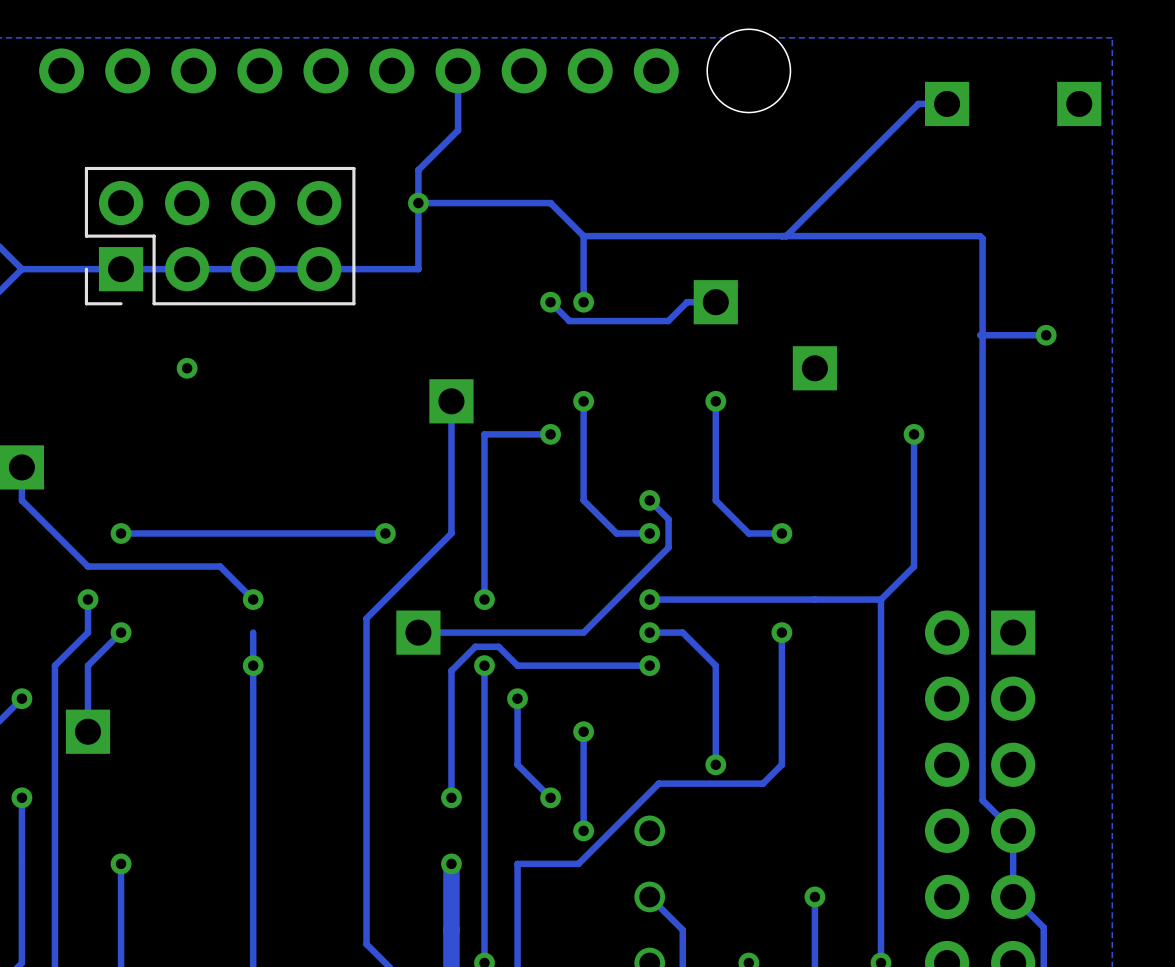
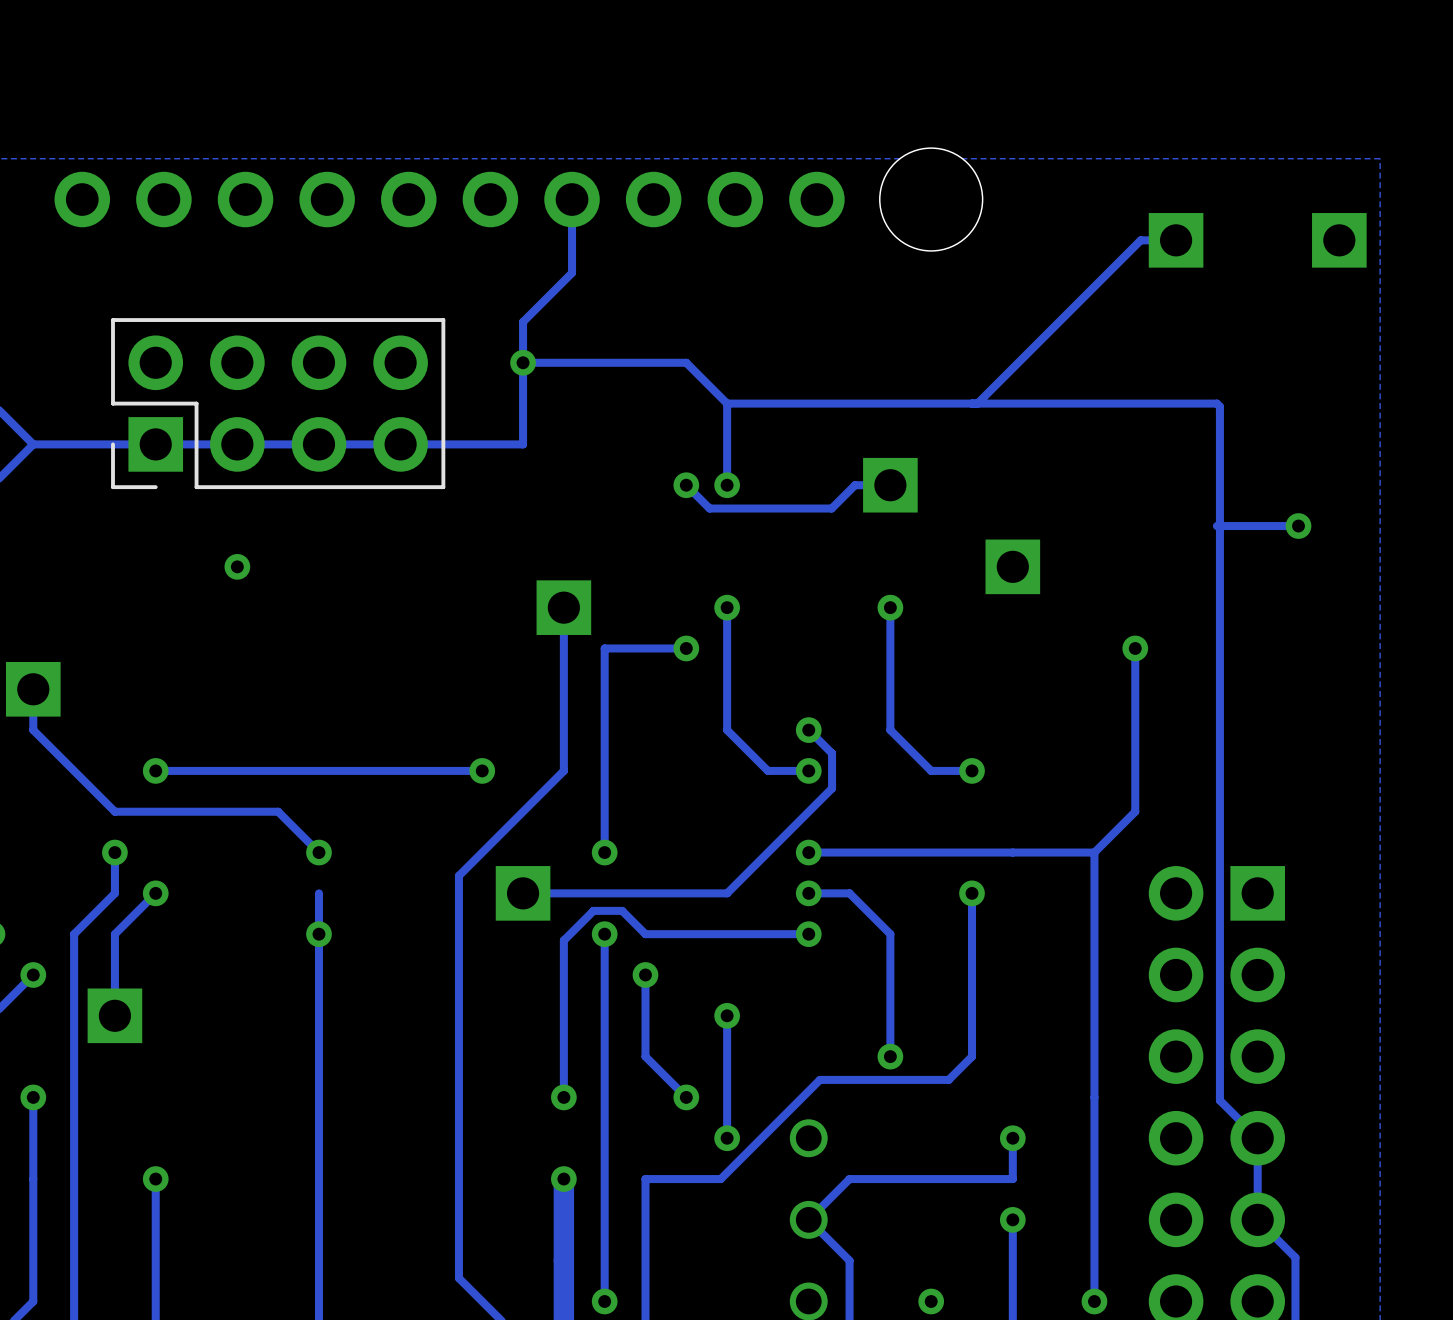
track: none -> (1012, 1138) (1012, 1179) (849, 1179) (808, 1219)
via: none -> (1012, 1138)

